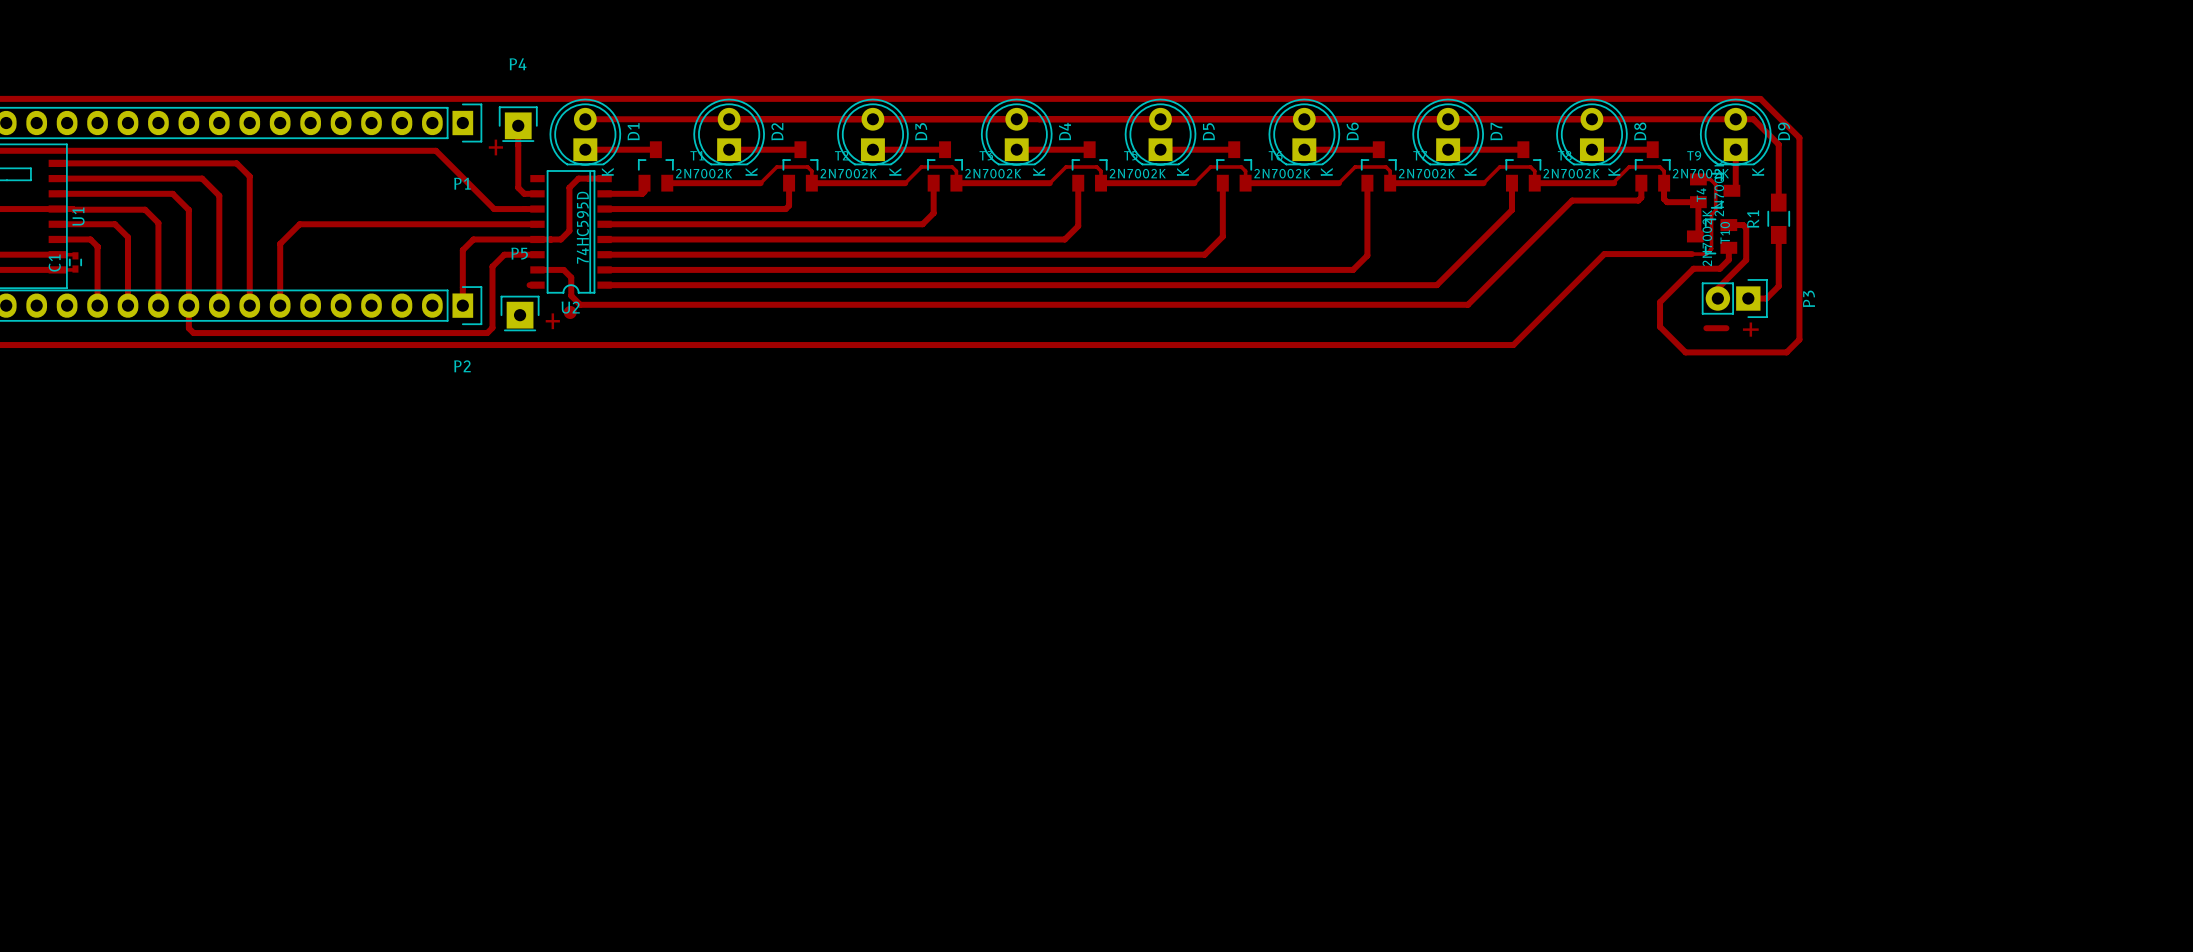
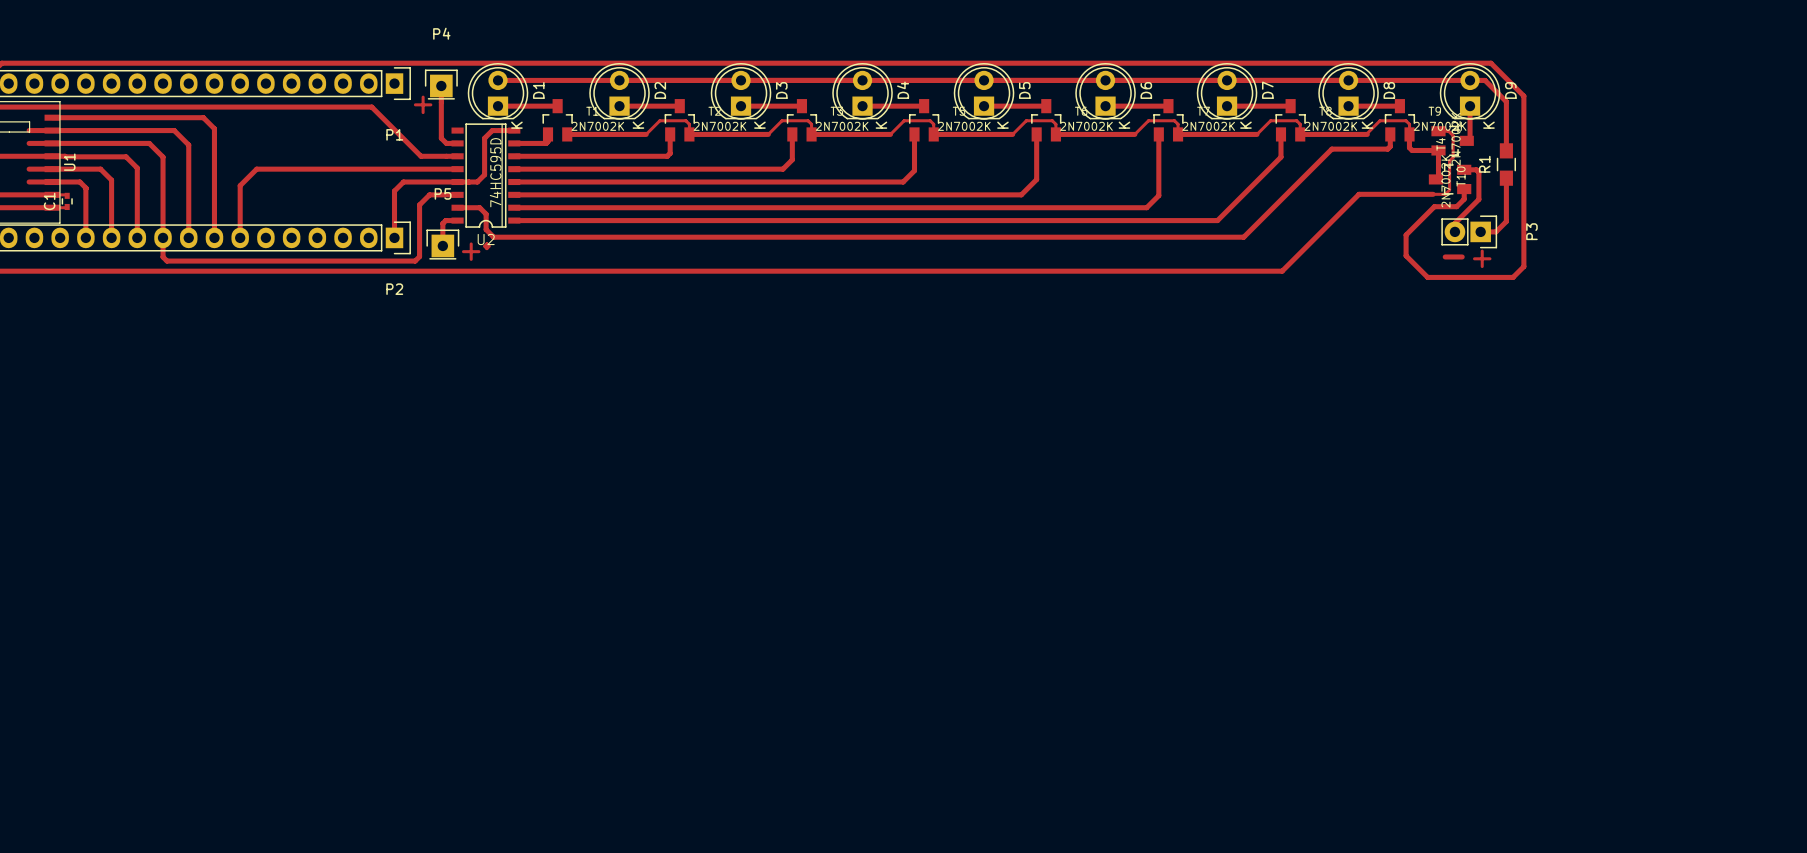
top track: none -> (29, 130) (52, 130)
top track: none -> (29, 143) (52, 143)
top track: none -> (29, 169) (52, 169)
top track: none -> (29, 181) (52, 181)
top track: none -> (450, 220) (445, 220) (442, 223) (442, 245)

